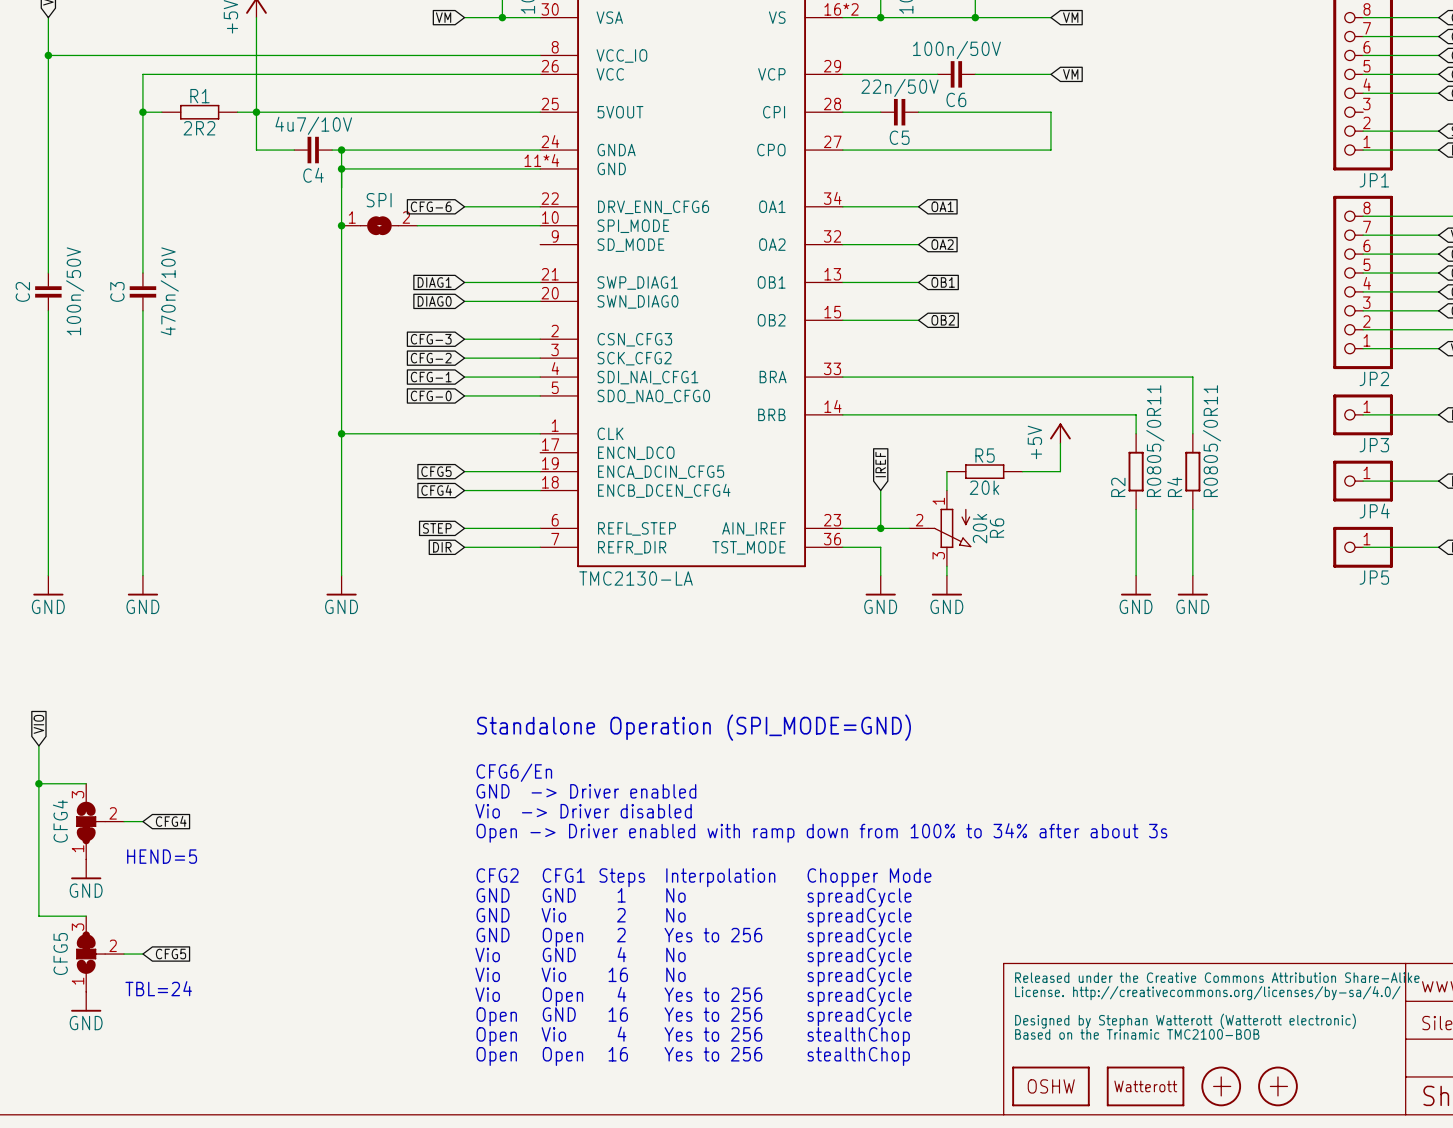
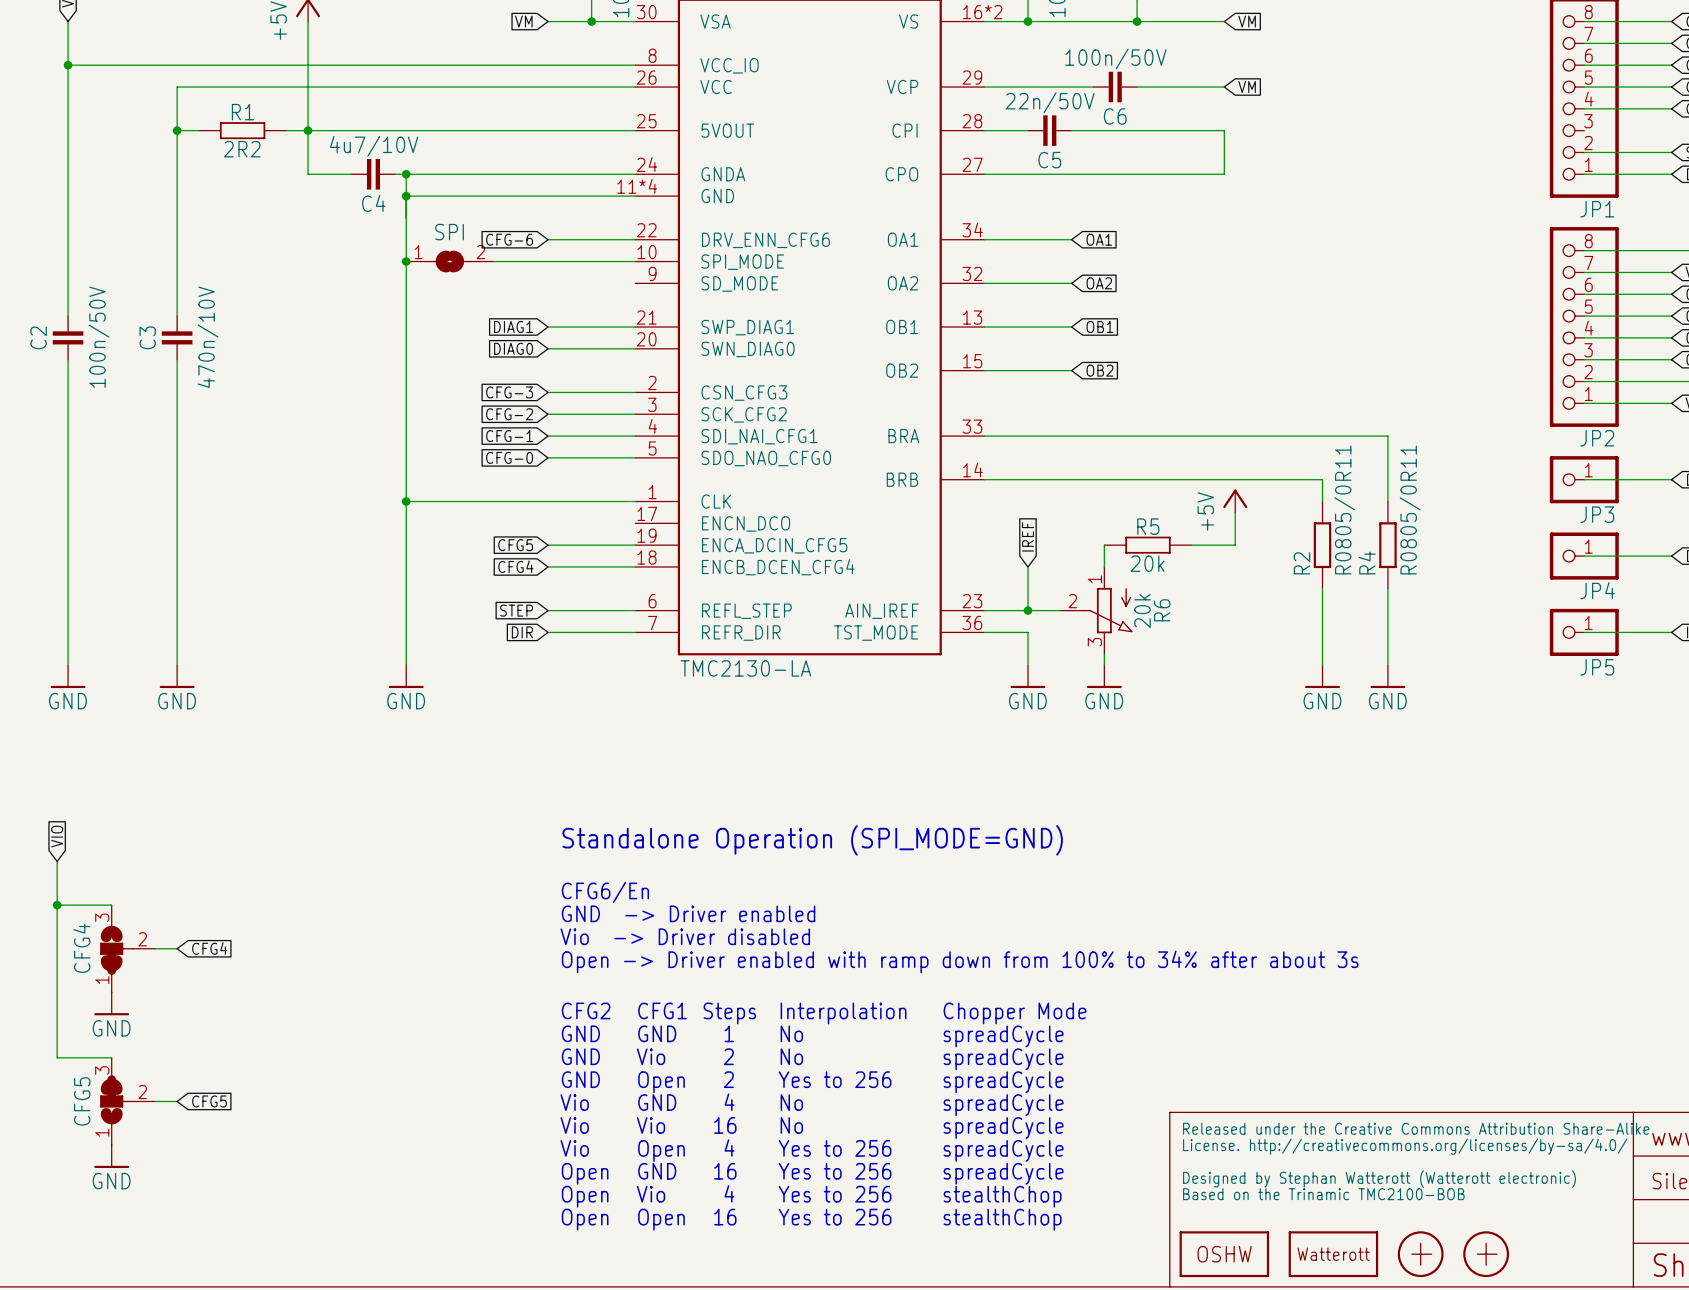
text: HEND=5 (162, 856) -> none
text: TBL=24 (158, 988) -> none

